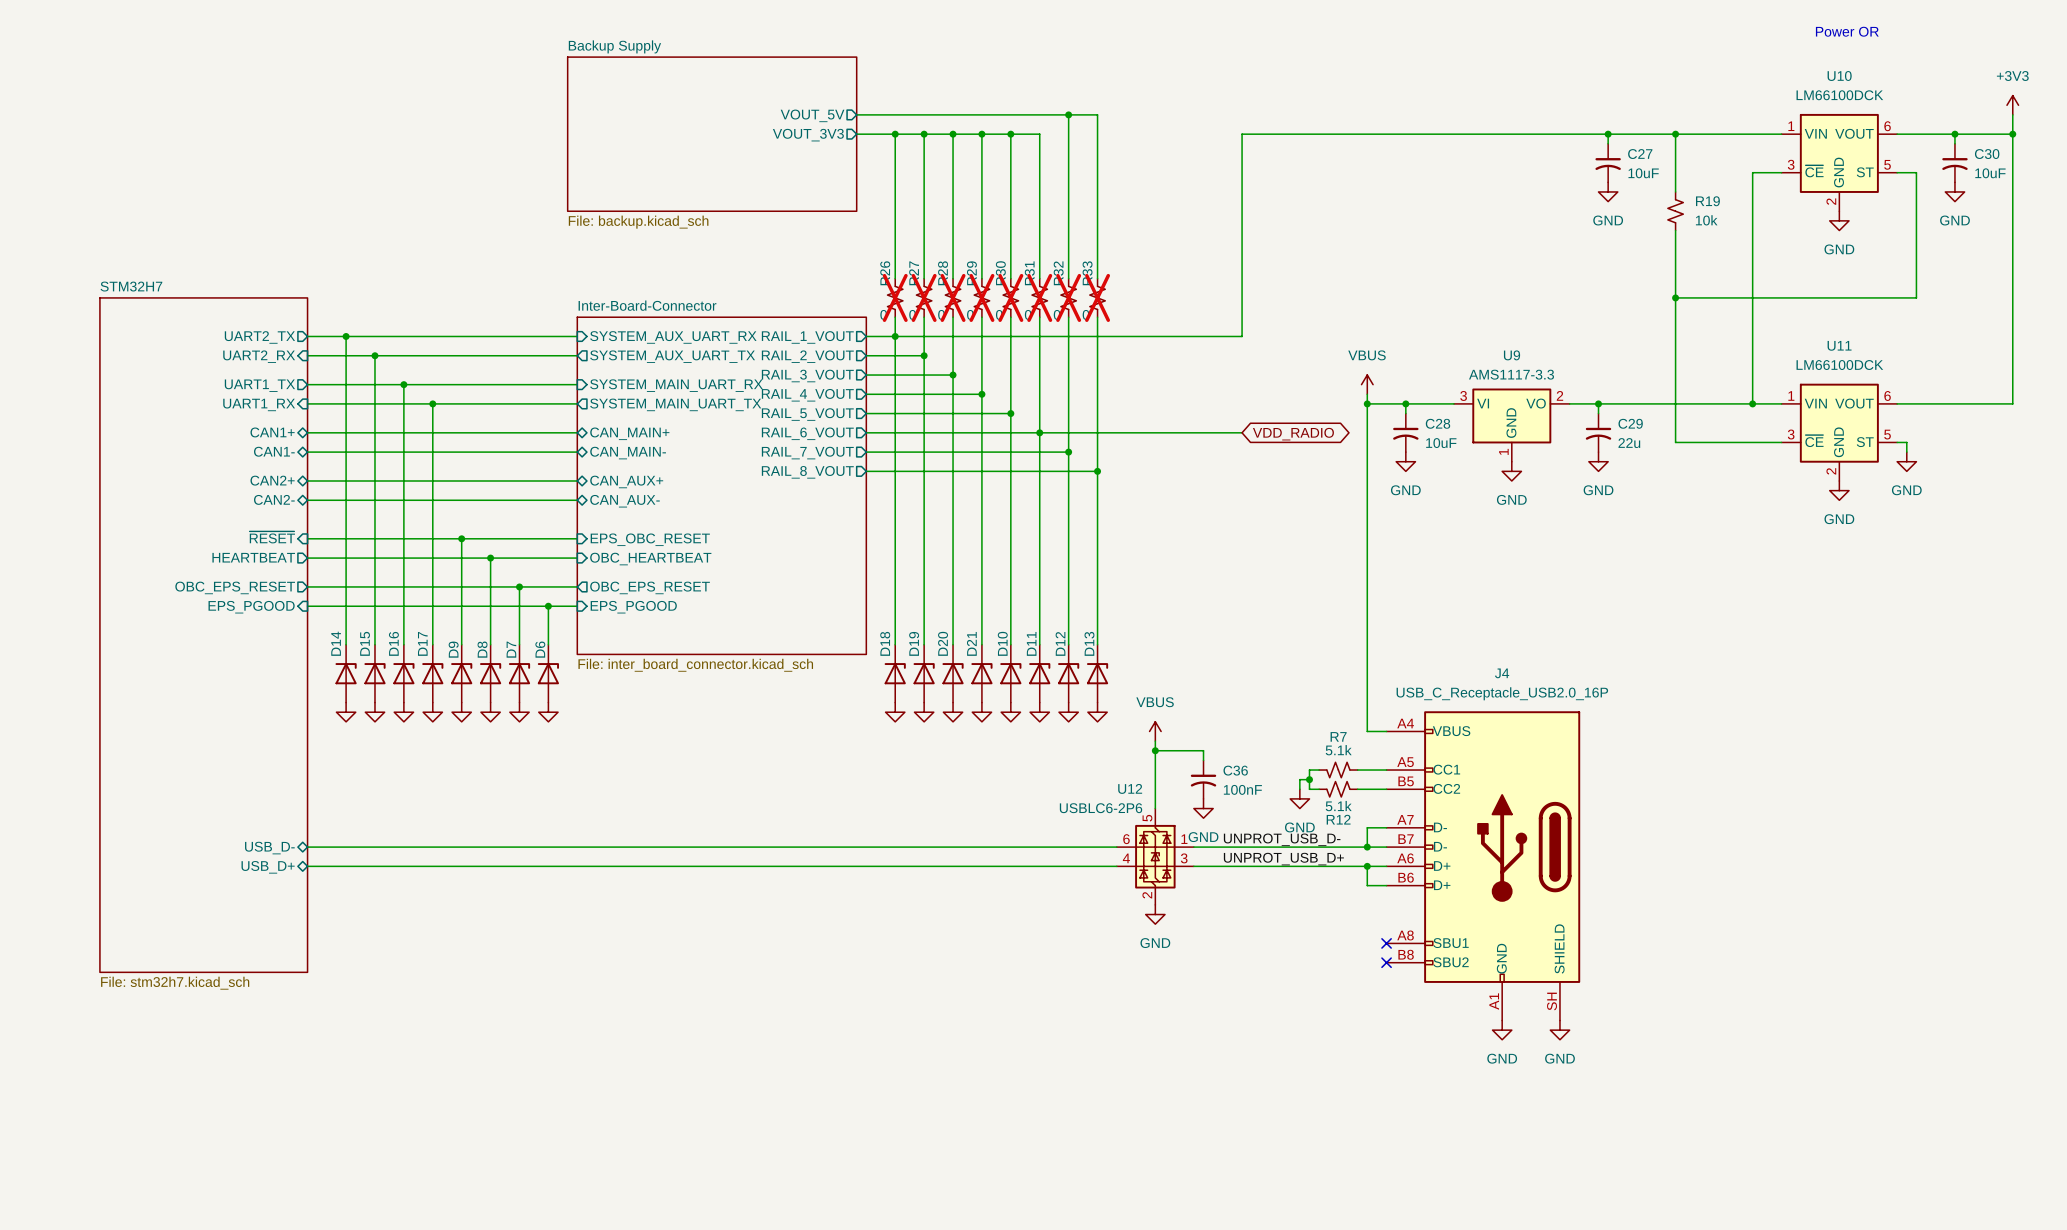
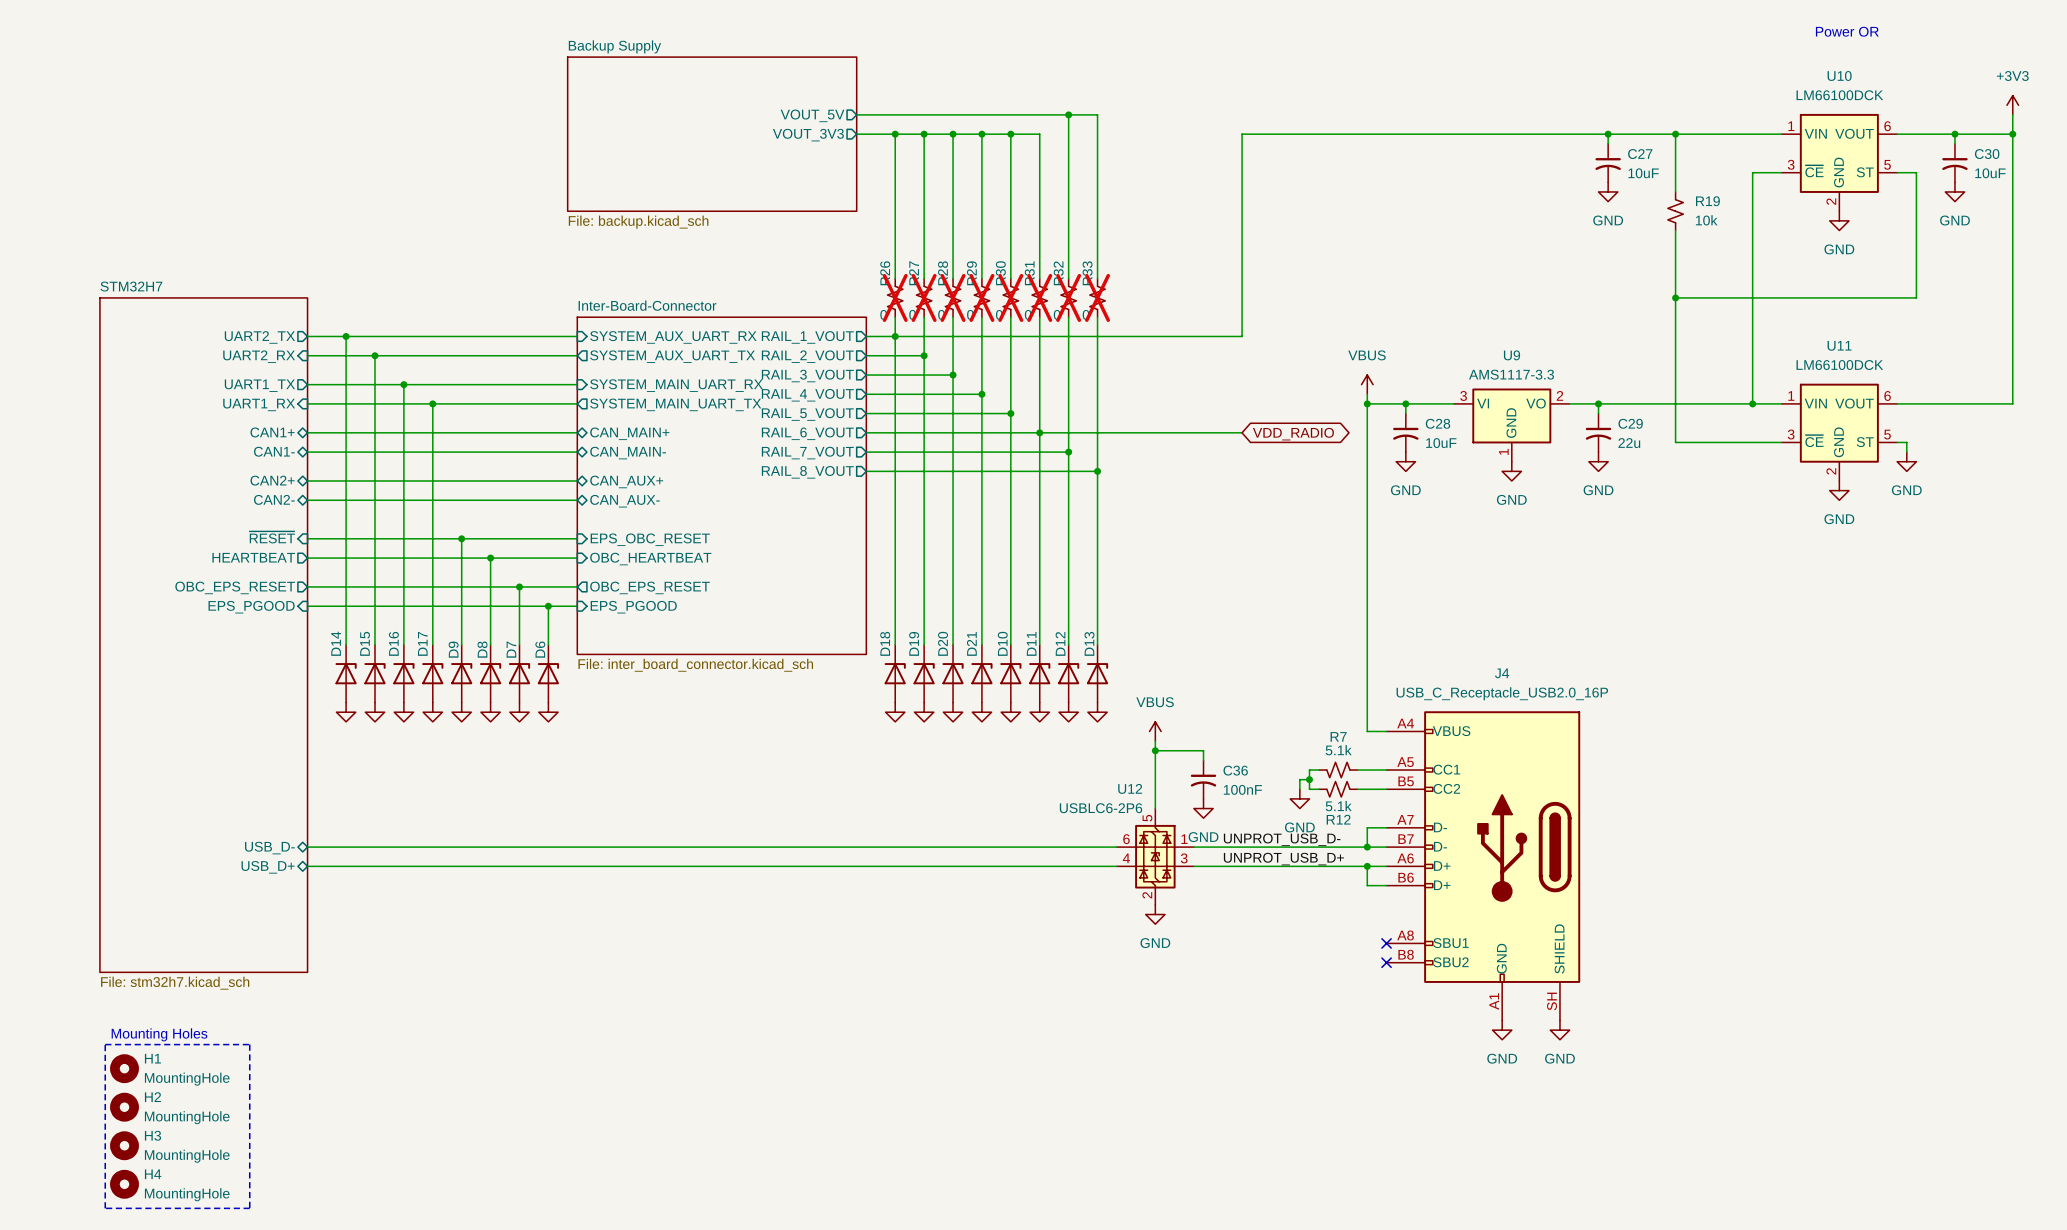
text: none -> Mounting Holes (159, 1034)
line: none -> (105, 1044) (249, 1044) (249, 1208) (105, 1208) (105, 1044)
H1: none -> MountingHole (124, 1068)
H2: none -> MountingHole (124, 1107)
H3: none -> MountingHole (124, 1145)
H4: none -> MountingHole (124, 1184)

